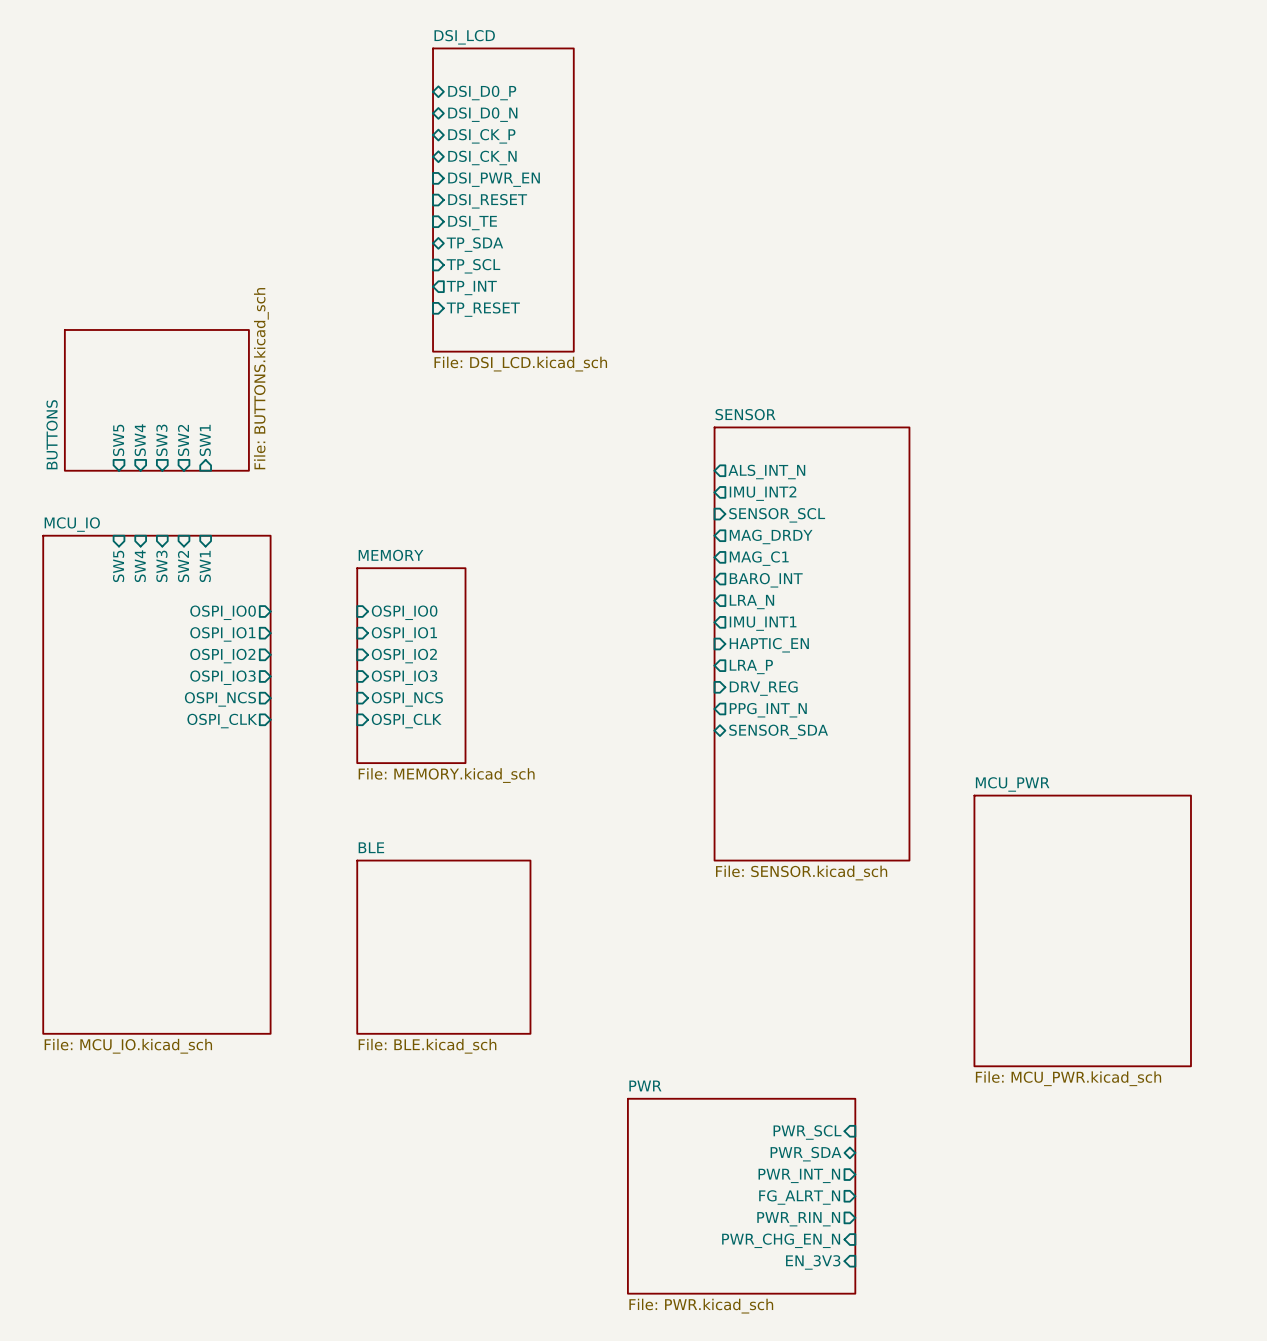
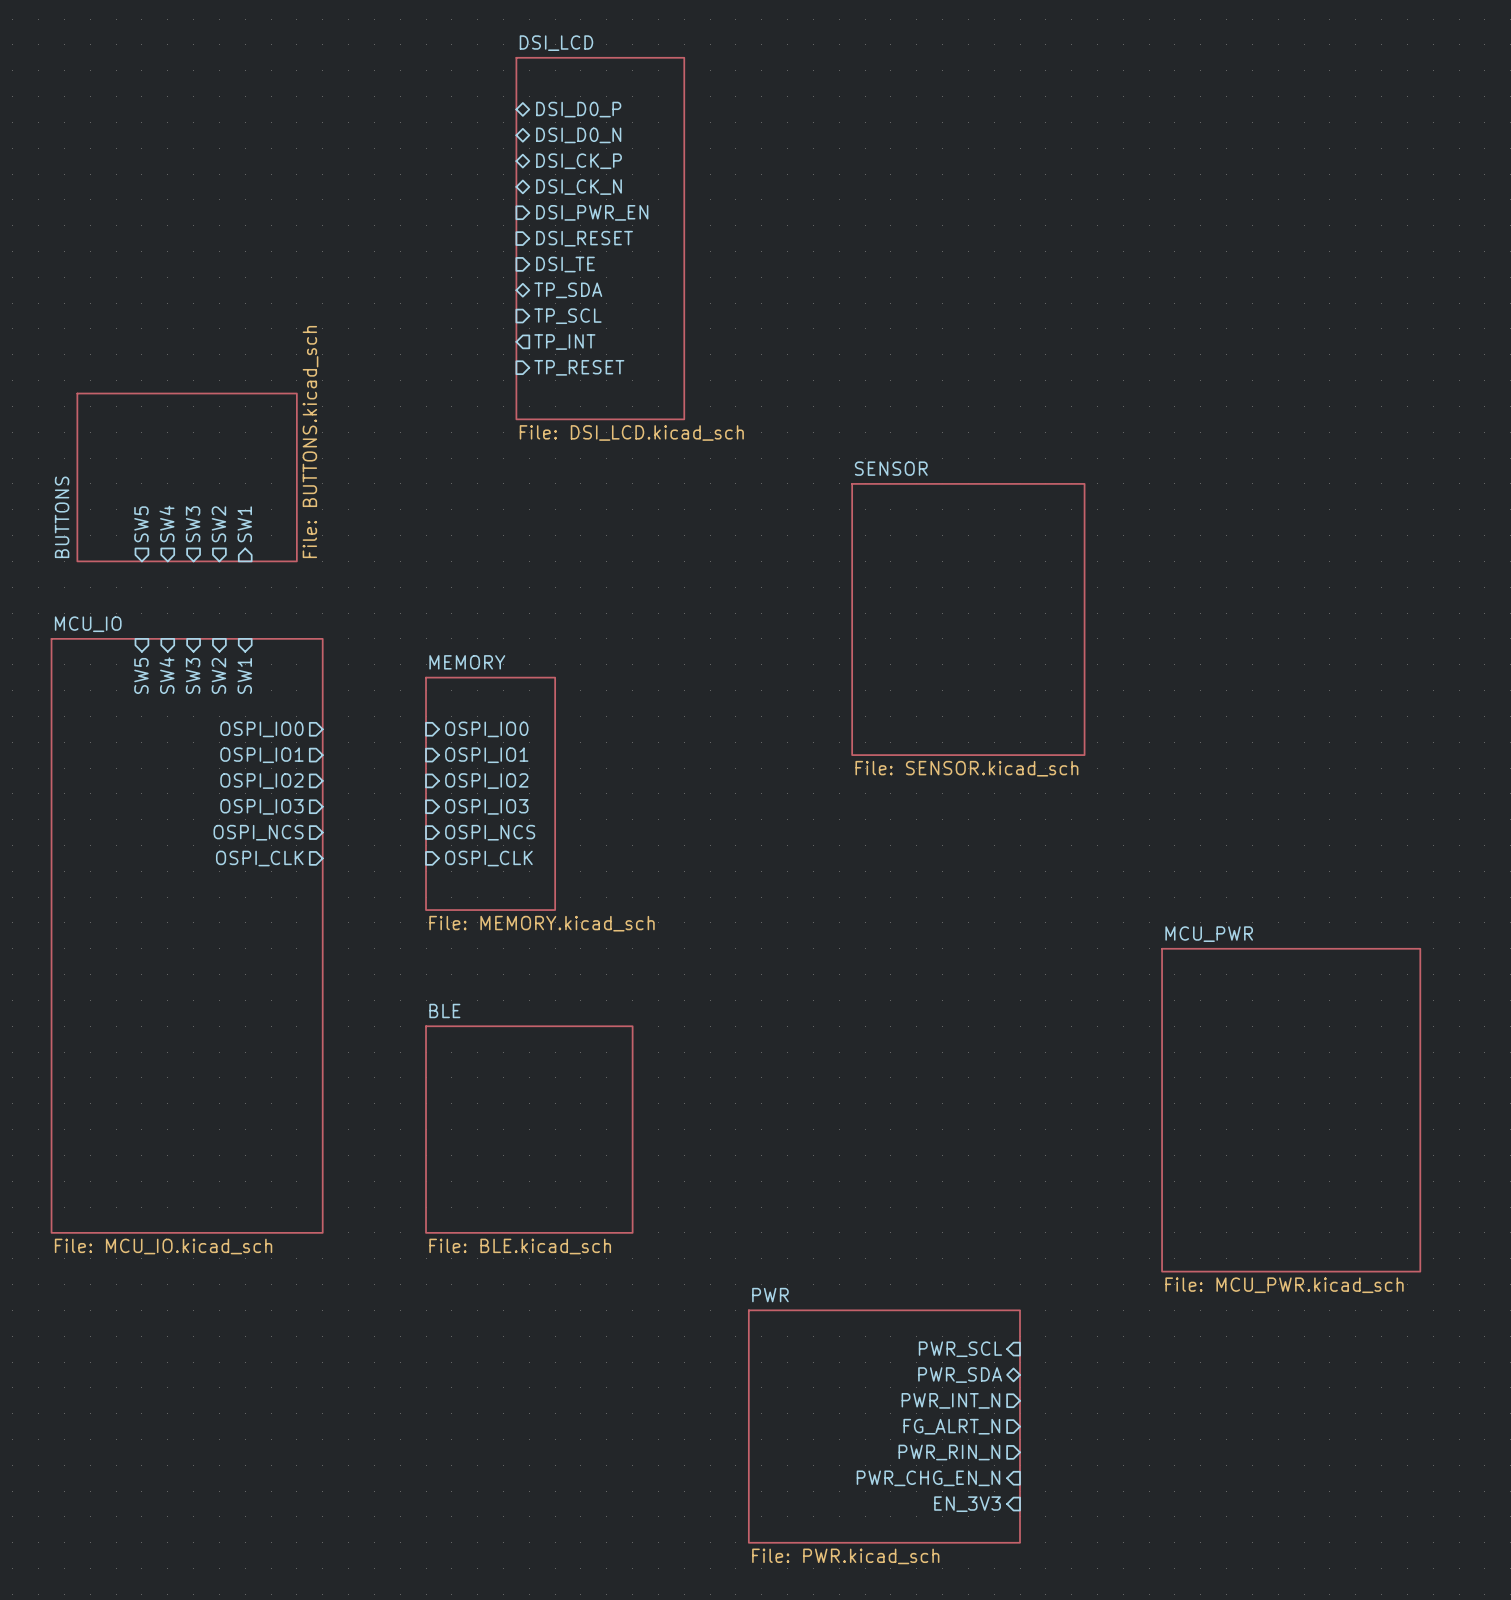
sheet pin: ALS_INT_N (766, 472) -> none
sheet pin: IMU_INT2 (763, 493) -> none
sheet pin: SENSOR_SCL (777, 515) -> none
sheet SENSOR: none -> File: SENSOR.kicad_sch (968, 619)
sheet pin: MAG_DRDY (771, 536) -> none
sheet pin: MAG_C1 (759, 558) -> none
sheet pin: BARO_INT (766, 580) -> none
sheet pin: LRA_N (751, 602) -> none
sheet pin: IMU_INT1 (763, 623) -> none
sheet SENSOR: File: SENSOR.kicad_sch (812, 644) -> none
sheet pin: HAPTIC_EN (769, 645) -> none
sheet pin: LRA_P (751, 667) -> none
sheet pin: DRV_REG (763, 688) -> none
sheet pin: PPG_INT_N (768, 710) -> none
sheet pin: SENSOR_SDA (778, 731) -> none

